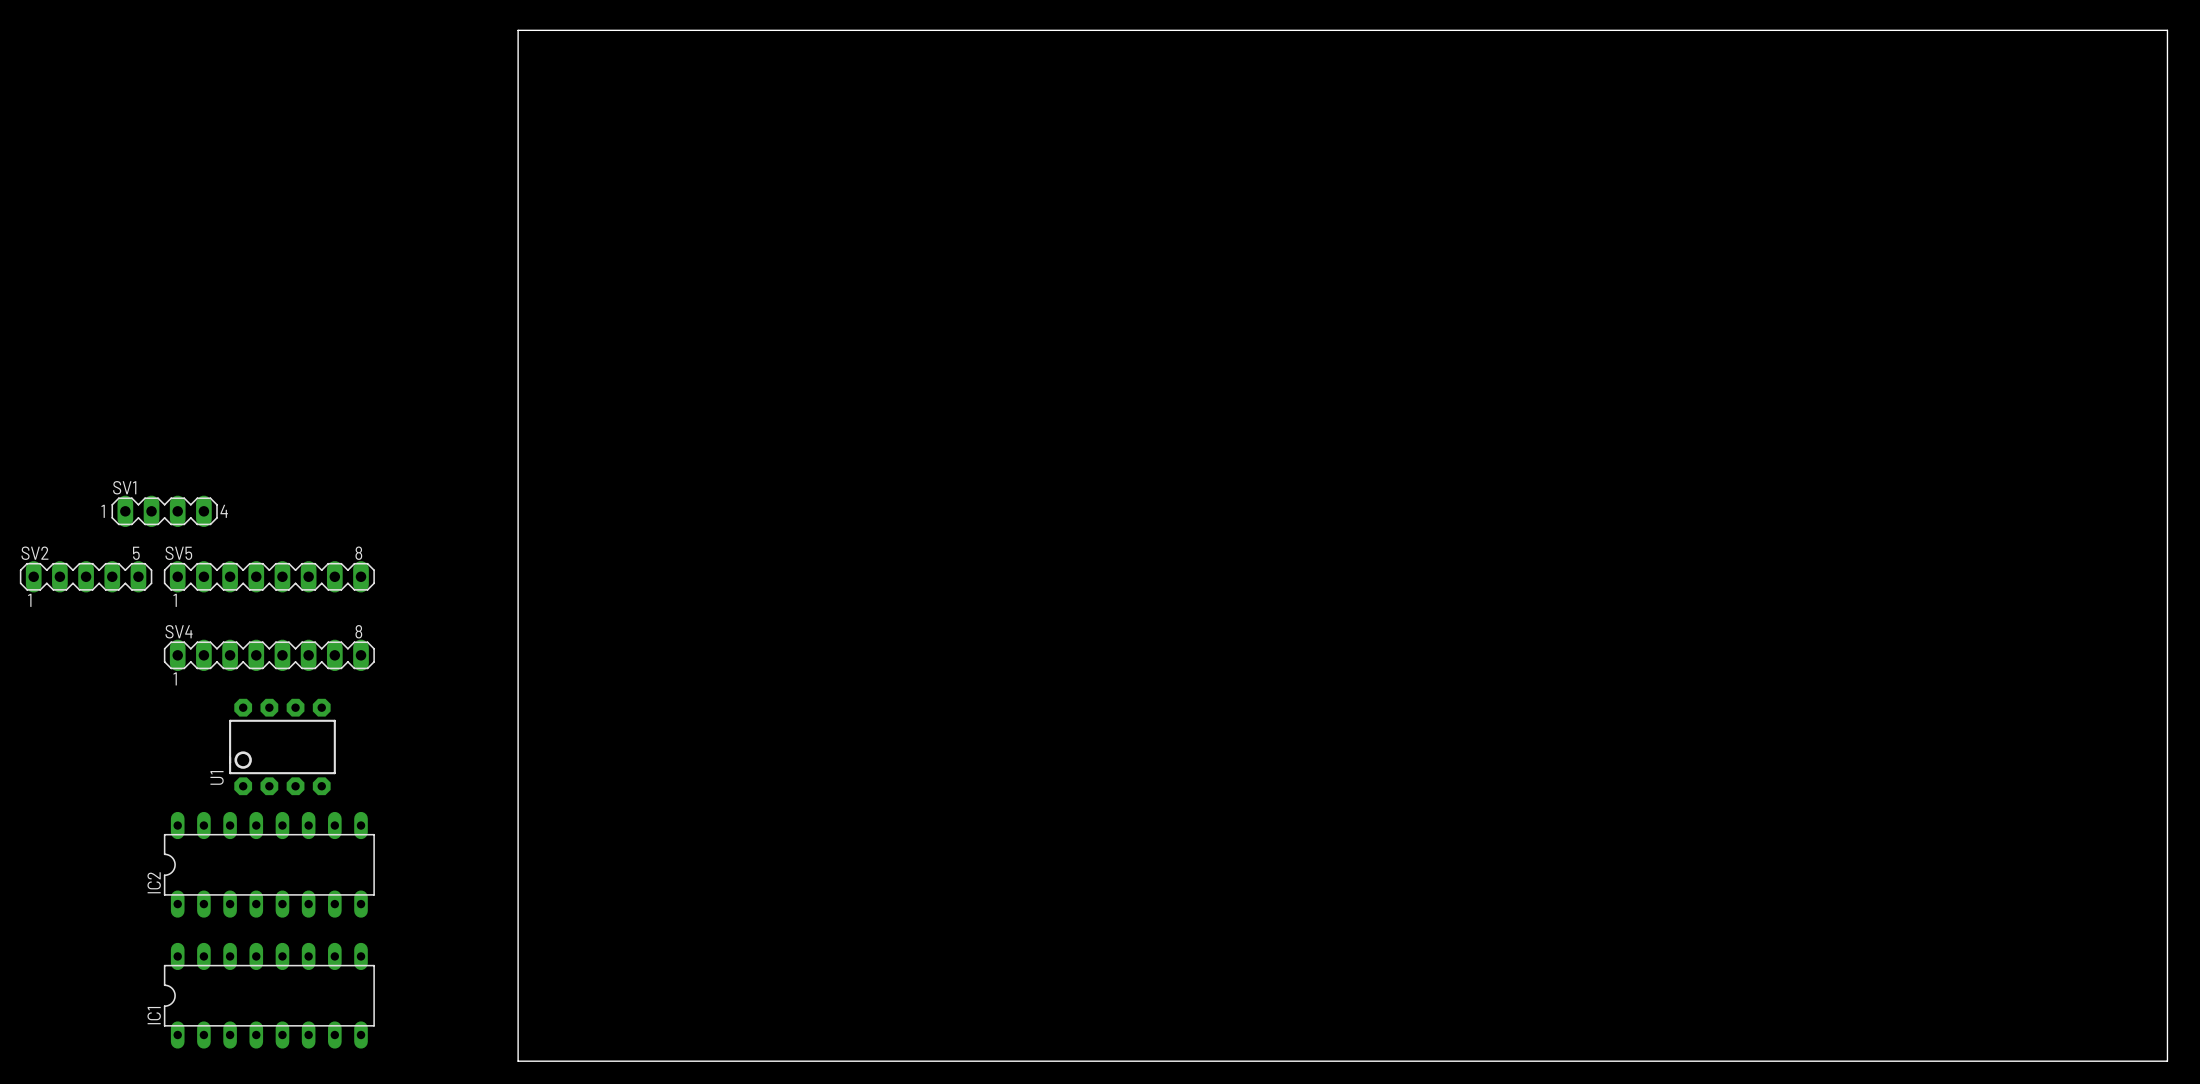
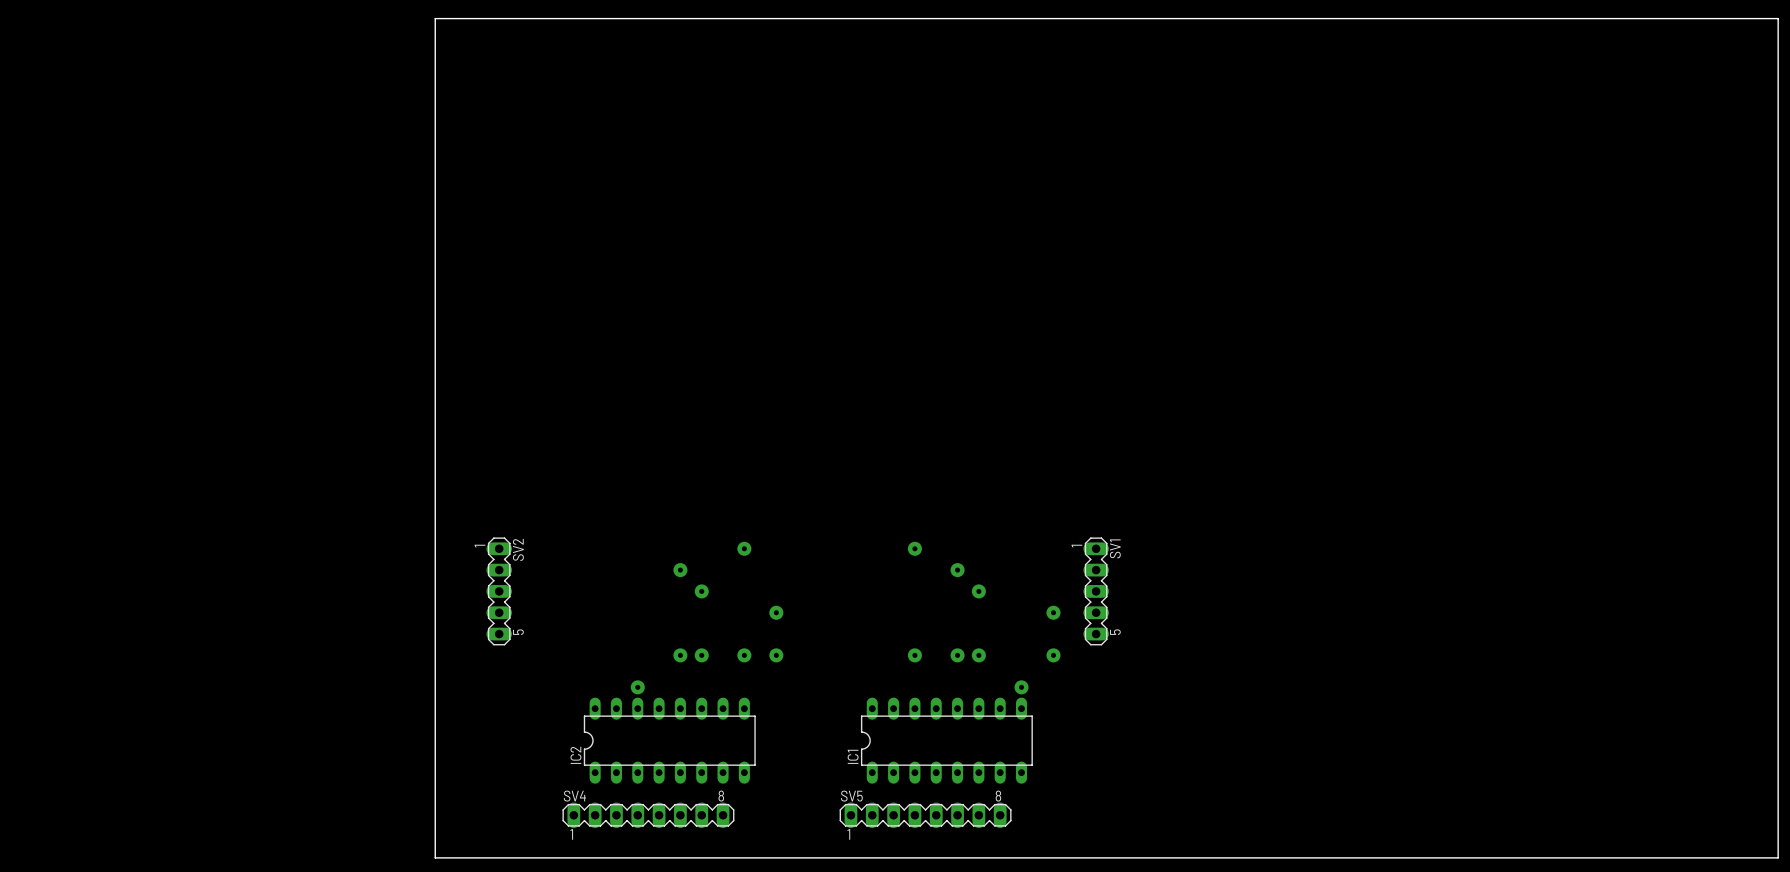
SV1 name position: SV1 (124, 487) -> SV1 (1115, 548)
SV1 footprint: [111, 495, 218, 528] -> [1083, 537, 1109, 646]
SV2 name position: SV2 (34, 553) -> SV2 (518, 549)
SV2 footprint: [19, 561, 153, 593] -> [486, 537, 513, 646]
SV5 position: (269, 576) -> (925, 815)
SV4 position: (269, 655) -> (648, 815)
via: none -> (744, 548)
via: none -> (914, 548)
via: none -> (680, 570)
via: none -> (957, 570)
via: none -> (701, 591)
via: none -> (978, 591)
U1: (282, 746) -> none
via: none -> (776, 612)
via: none -> (1053, 612)
via: none -> (680, 655)
via: none -> (701, 655)
via: none -> (744, 655)
via: none -> (776, 655)
via: none -> (914, 655)
via: none -> (957, 655)
via: none -> (978, 655)
via: none -> (1053, 655)
via: none -> (637, 687)
via: none -> (1021, 687)
IC2 position: (269, 864) -> (669, 740)
IC1 position: (269, 995) -> (946, 740)

